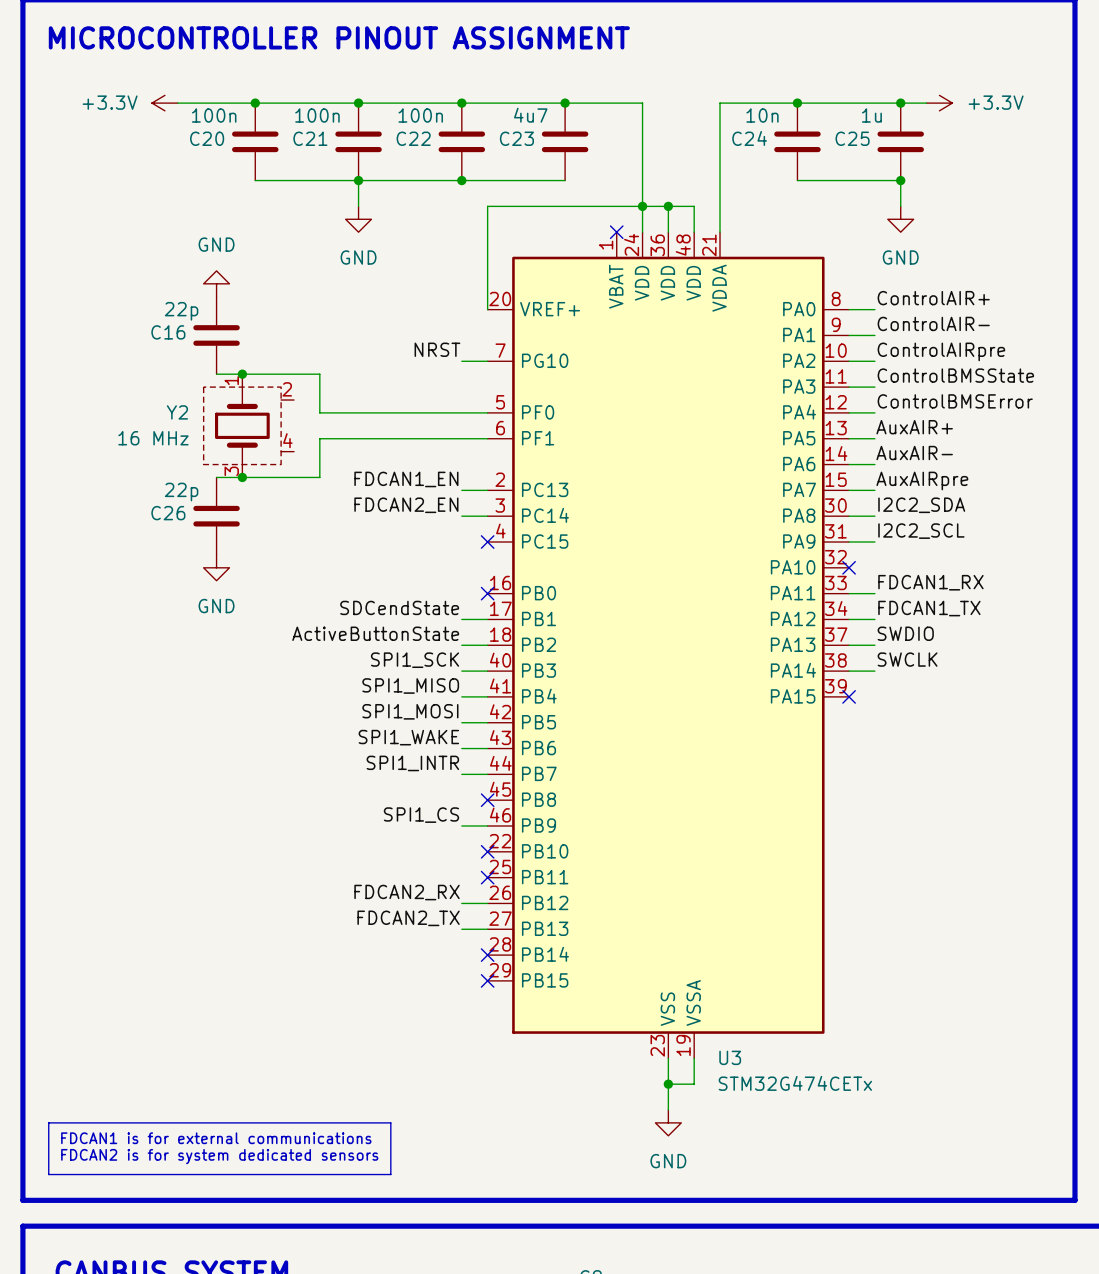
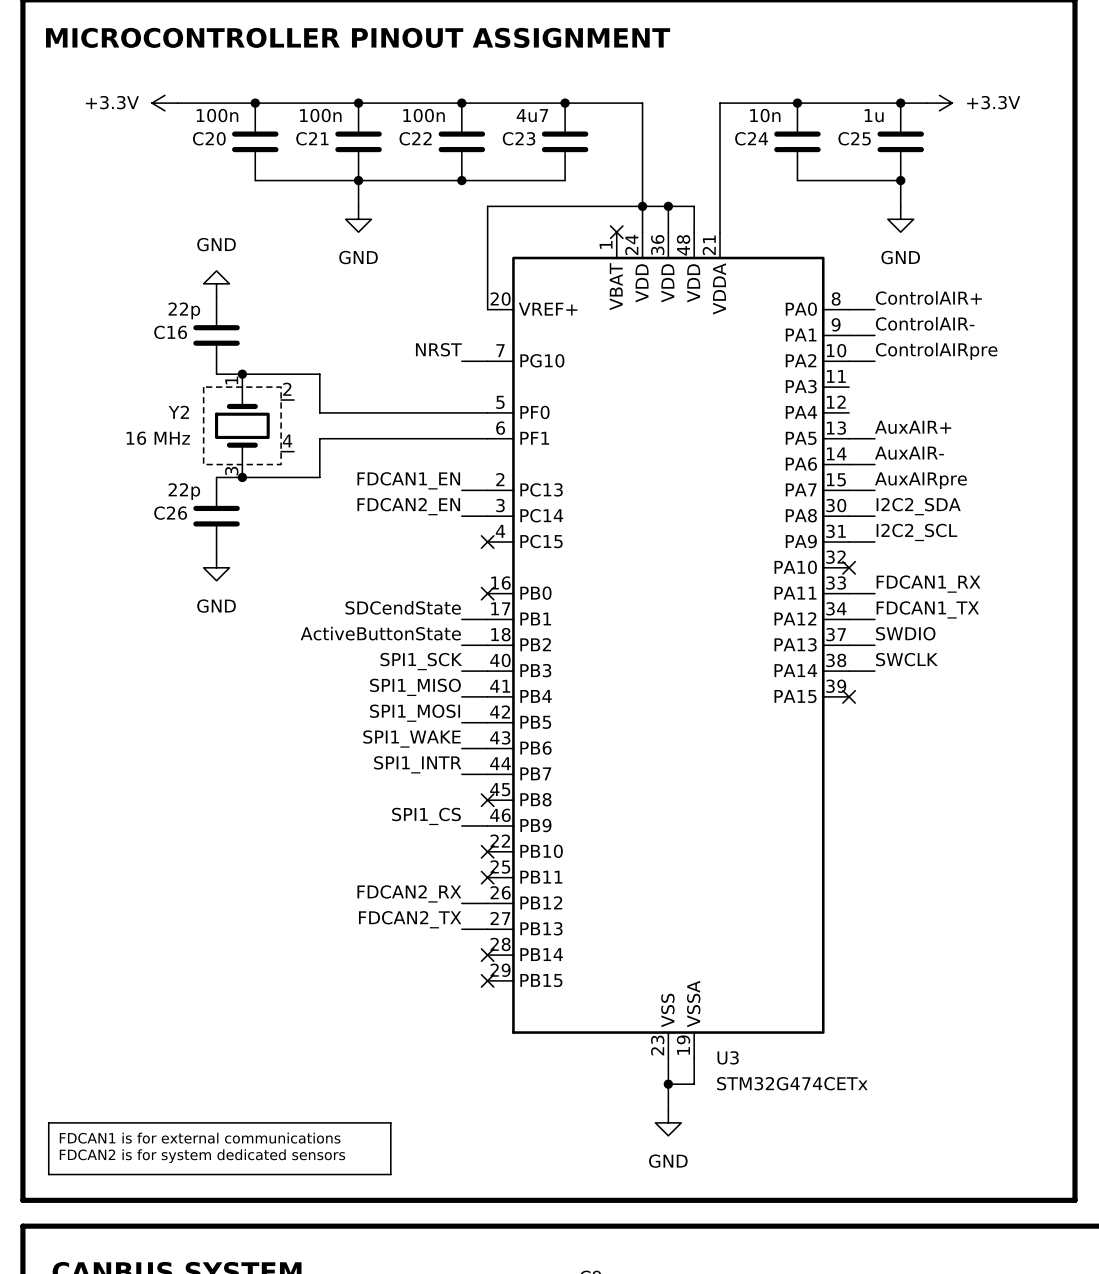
label: ControlBMSState (955, 375) -> none
wire: (849, 387) (874, 387) -> none
label: ControlBMSError (955, 401) -> none
wire: (849, 412) (874, 412) -> none

